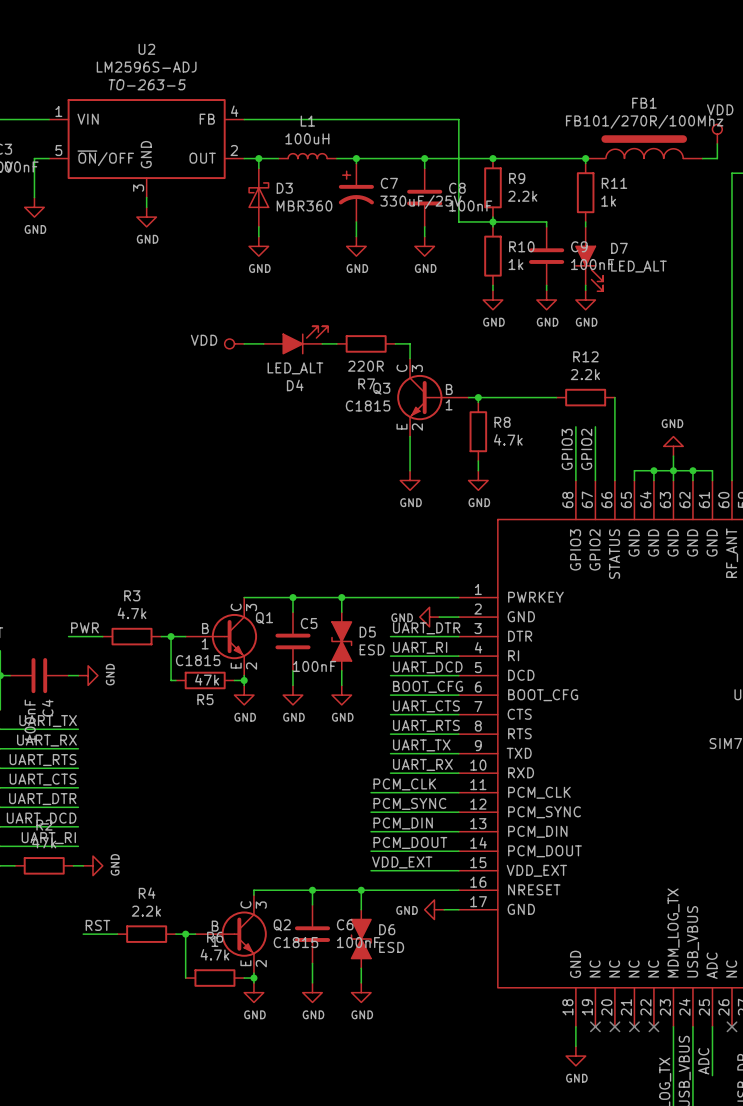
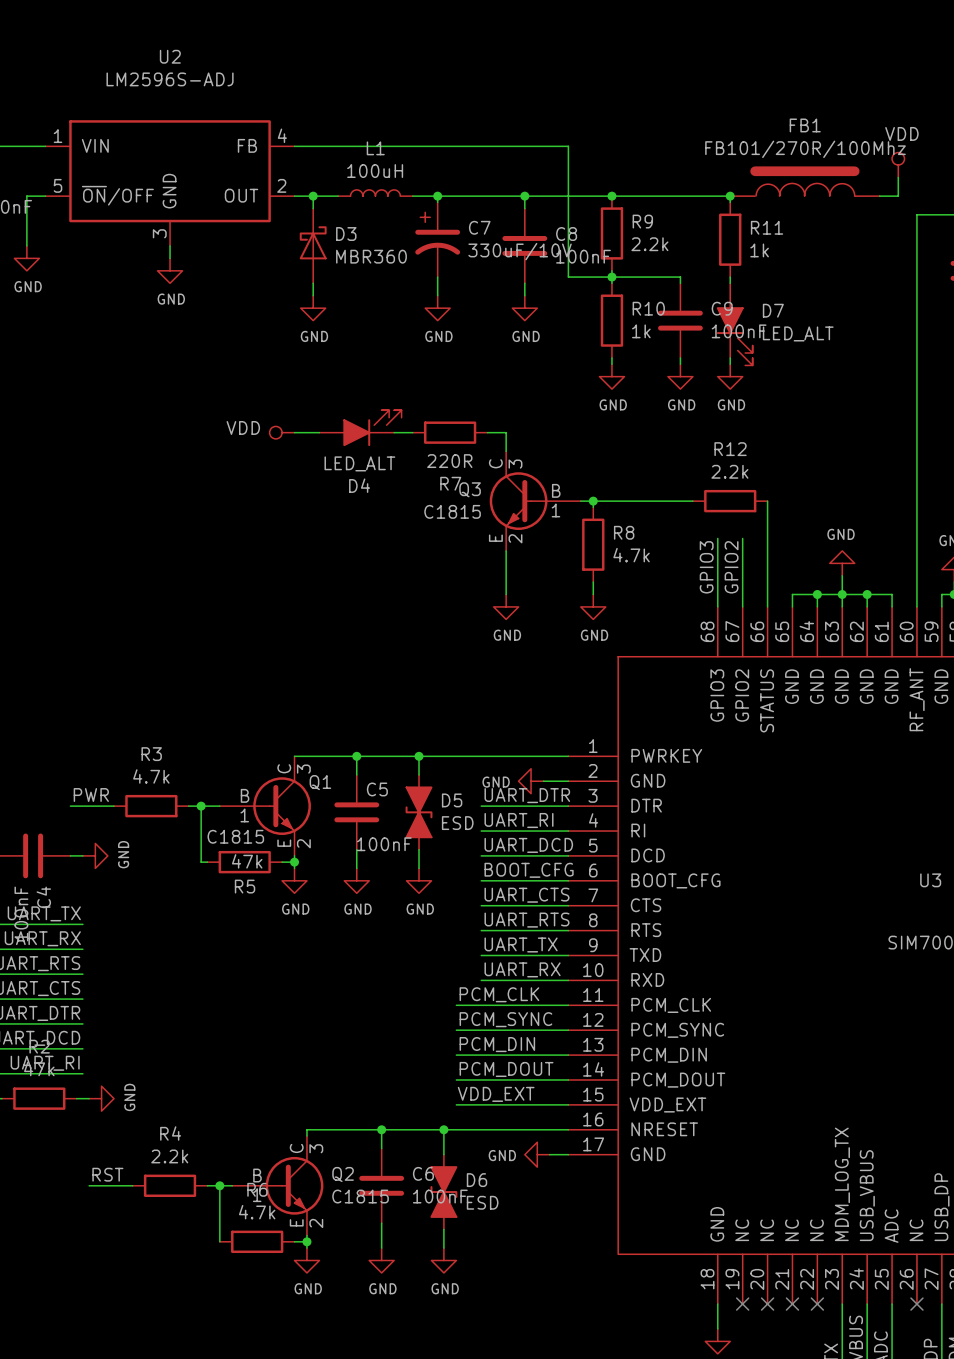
U2 text: TO-263-5 (147, 84) -> none
C7 value: 330uF/25V (420, 202) -> 330uF/10V (520, 251)

